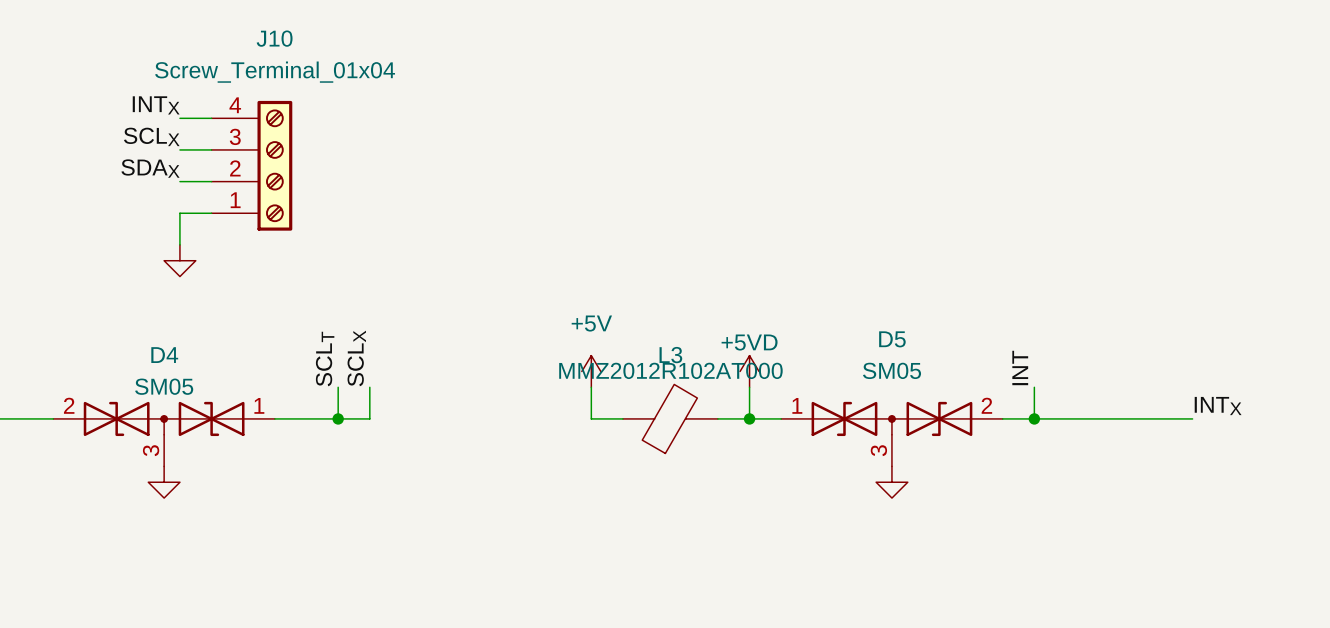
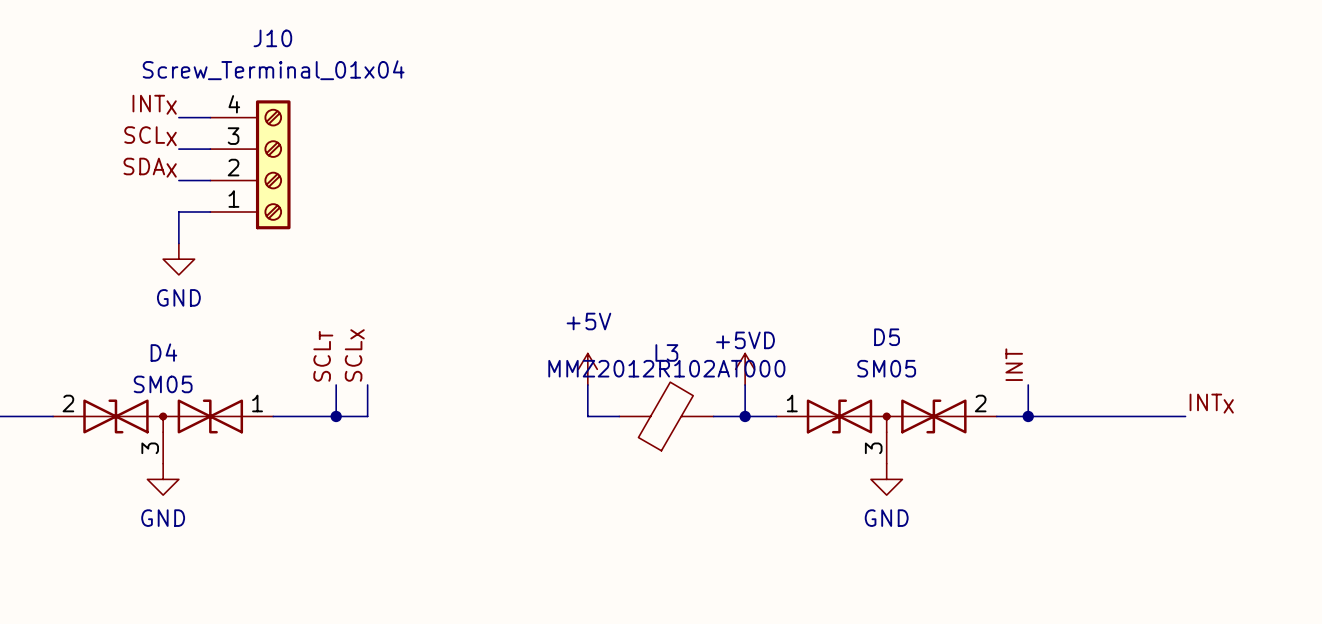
power symbol text: none -> GND (178, 297)
power symbol text: none -> GND (163, 518)
power symbol text: none -> GND (886, 518)

